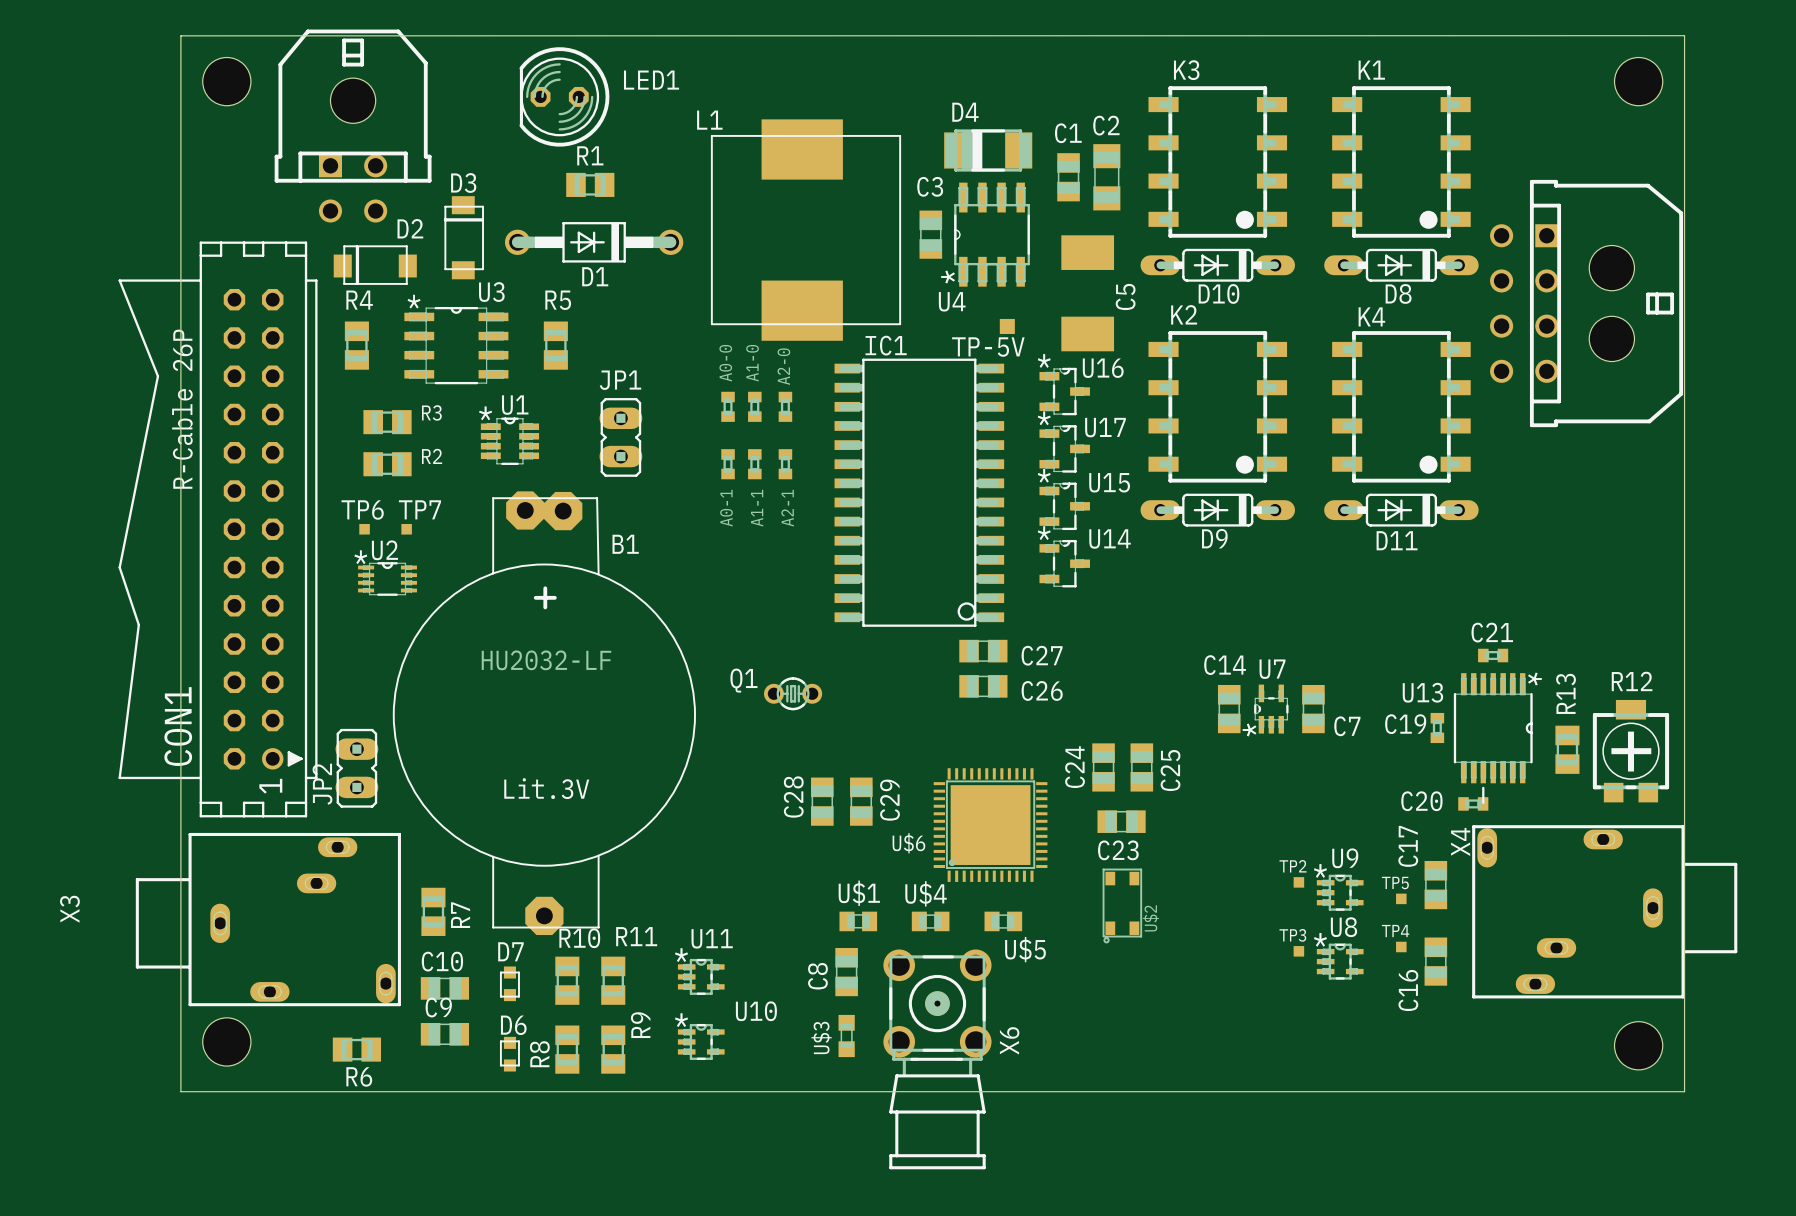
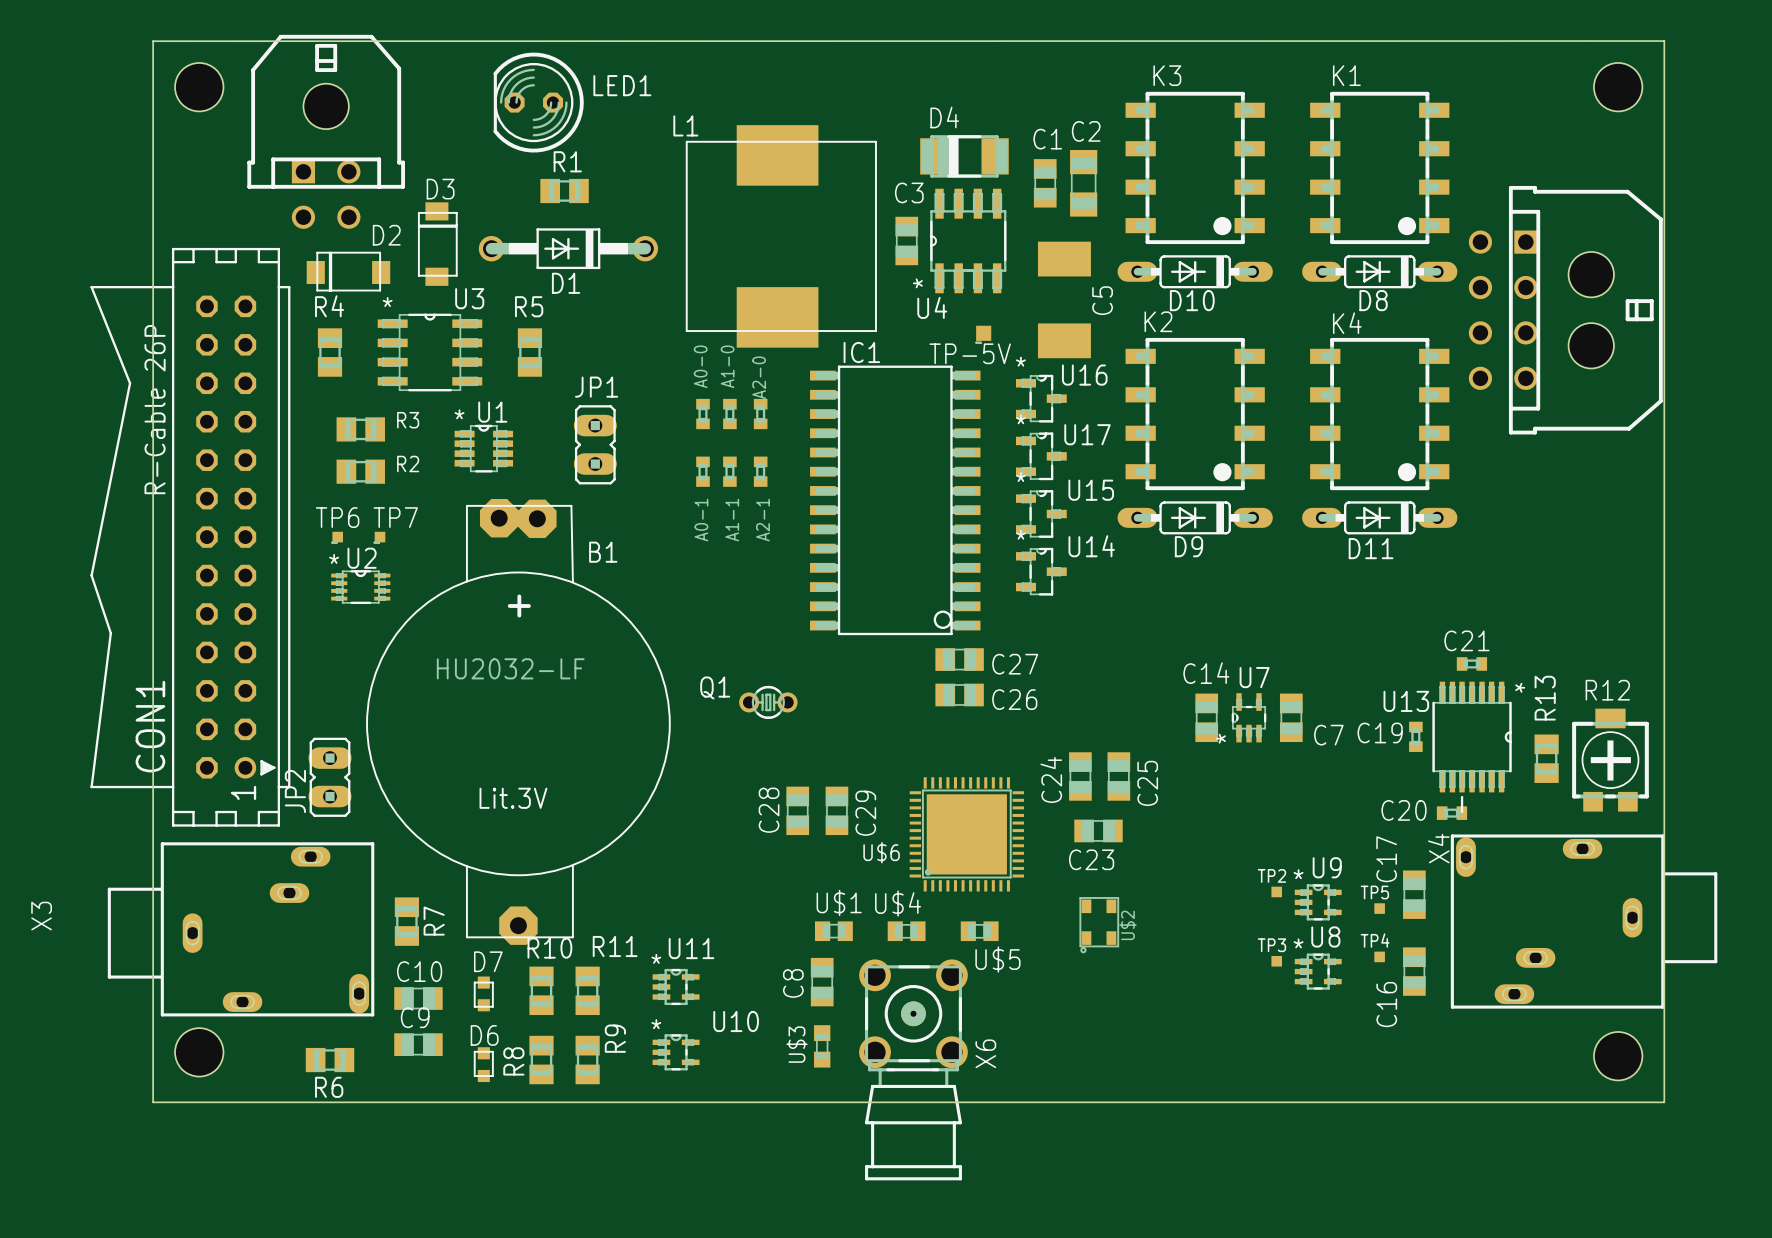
U$2 footprint: [1102, 868, 1143, 944] -> [1079, 897, 1120, 954]

